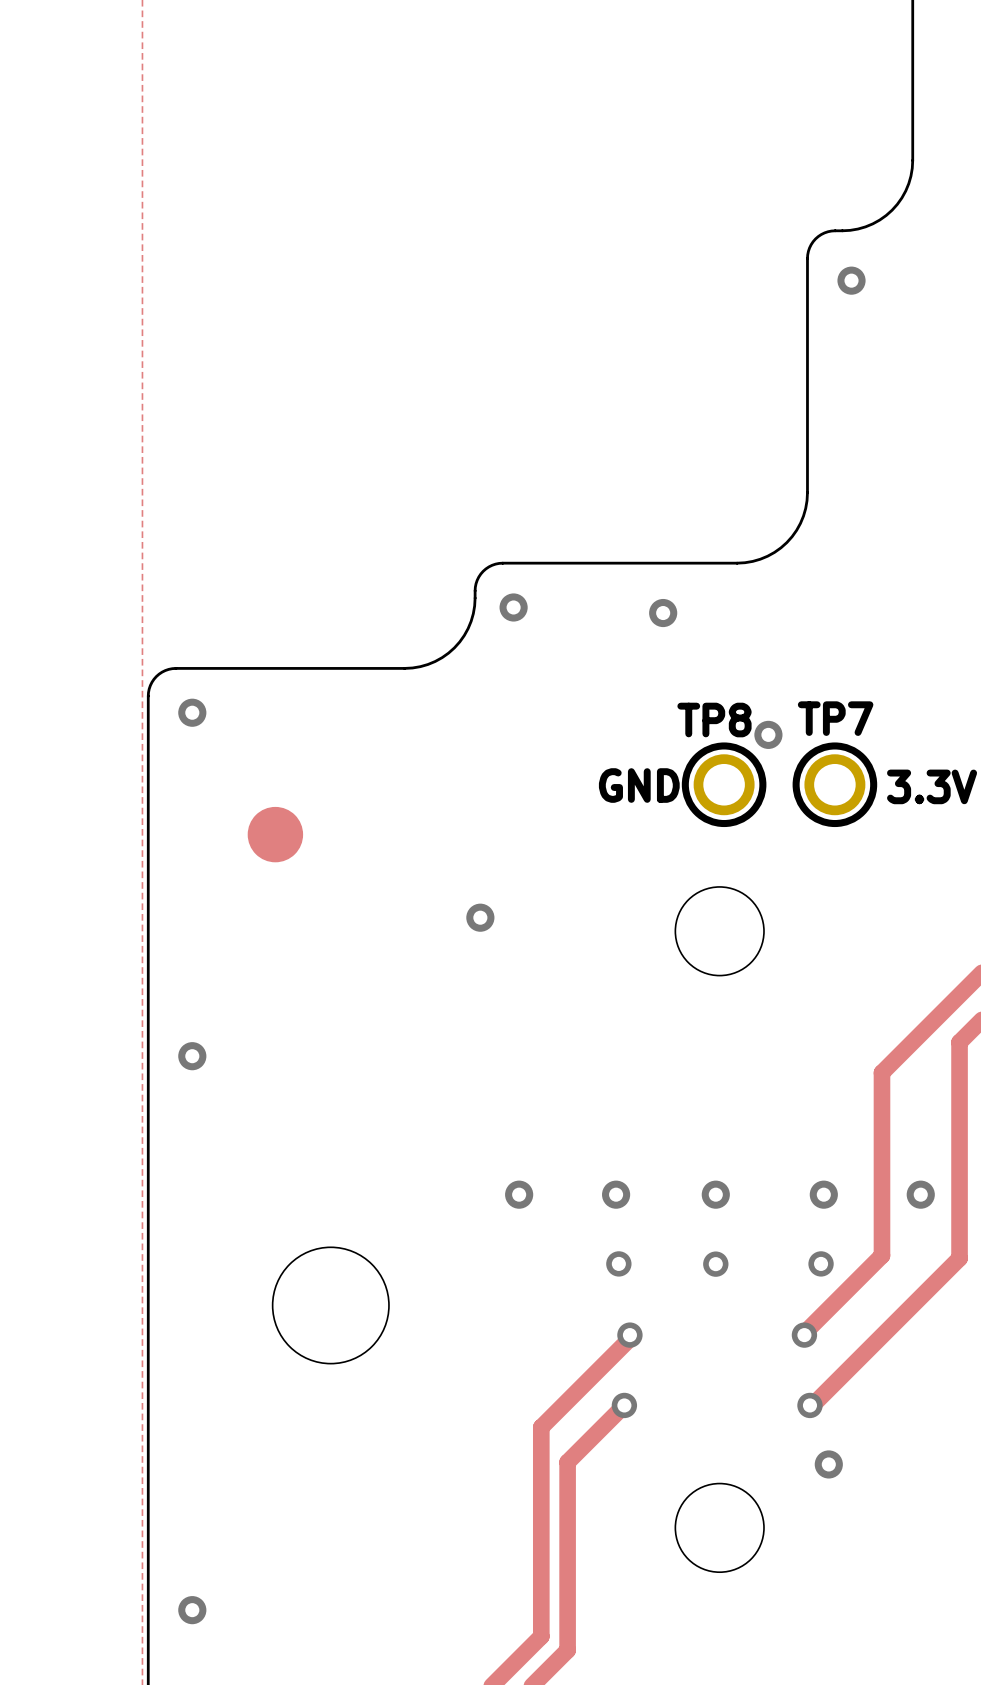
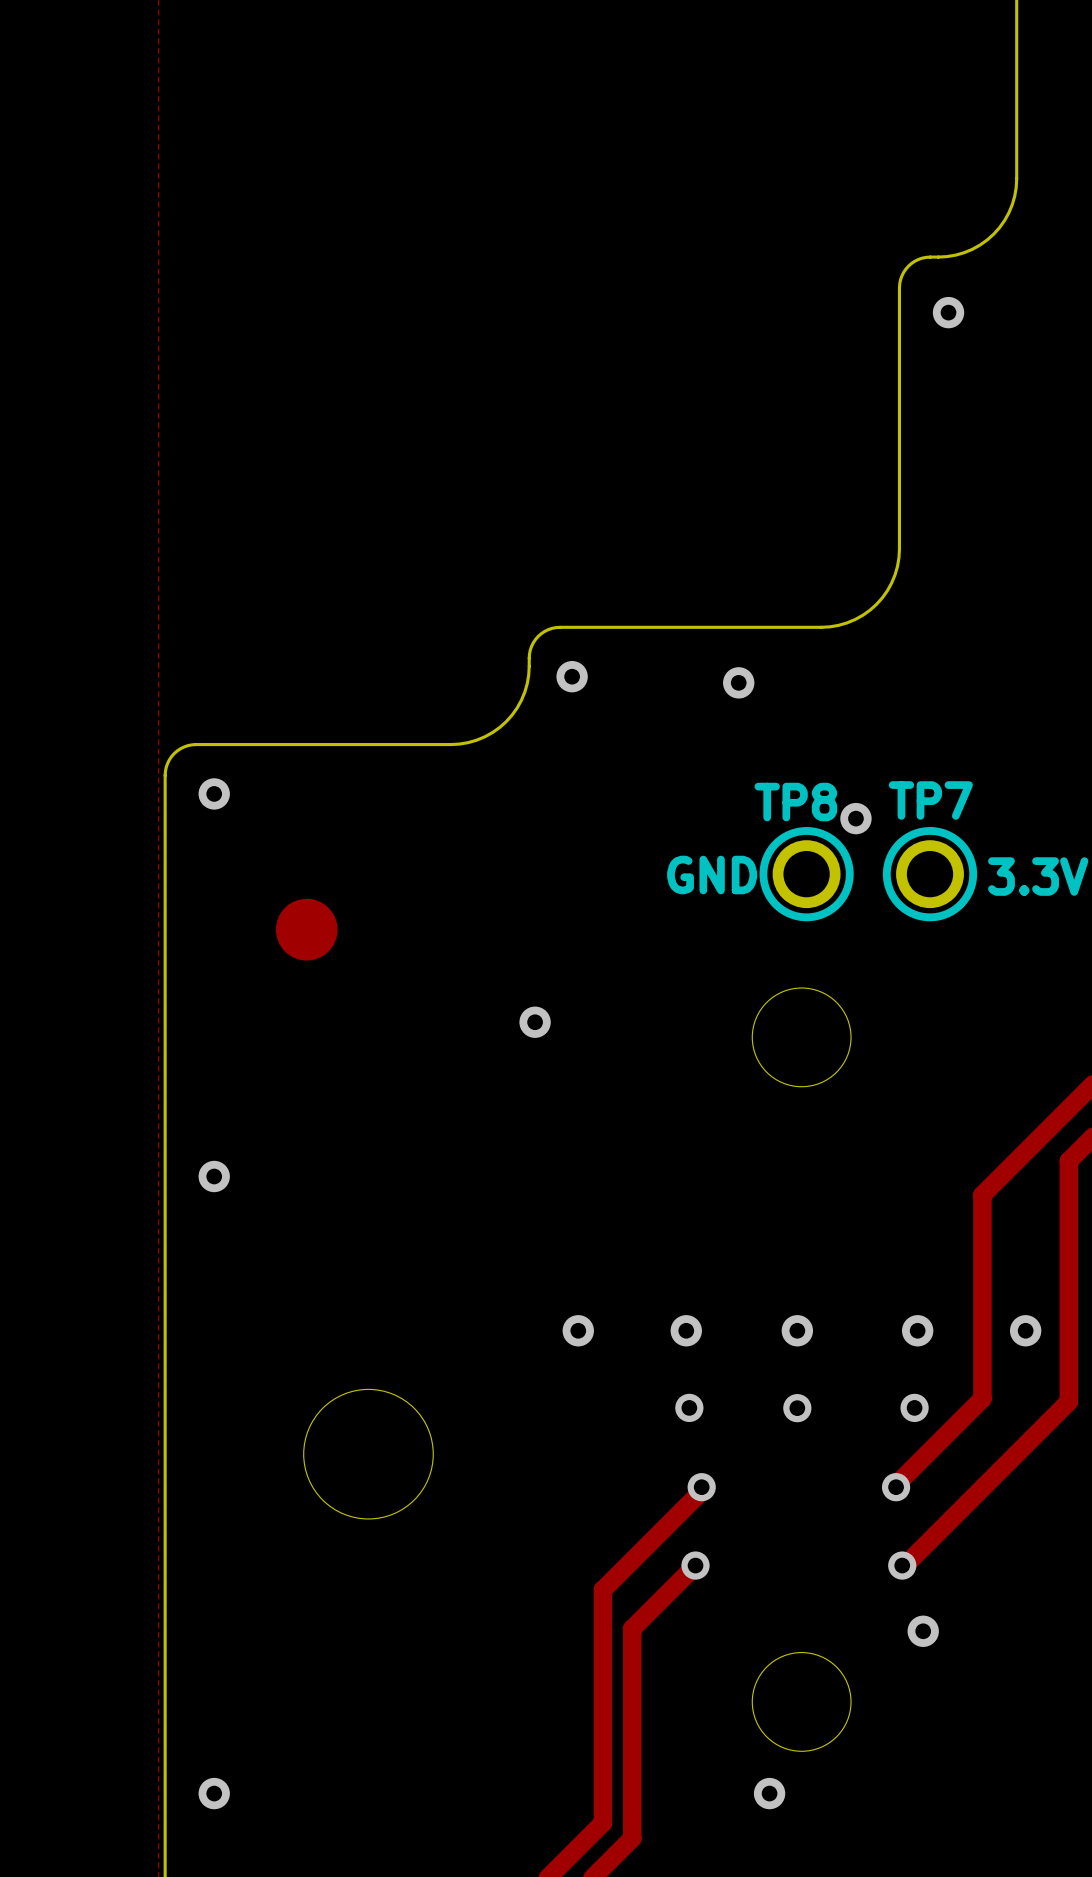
via: none -> (769, 1793)

